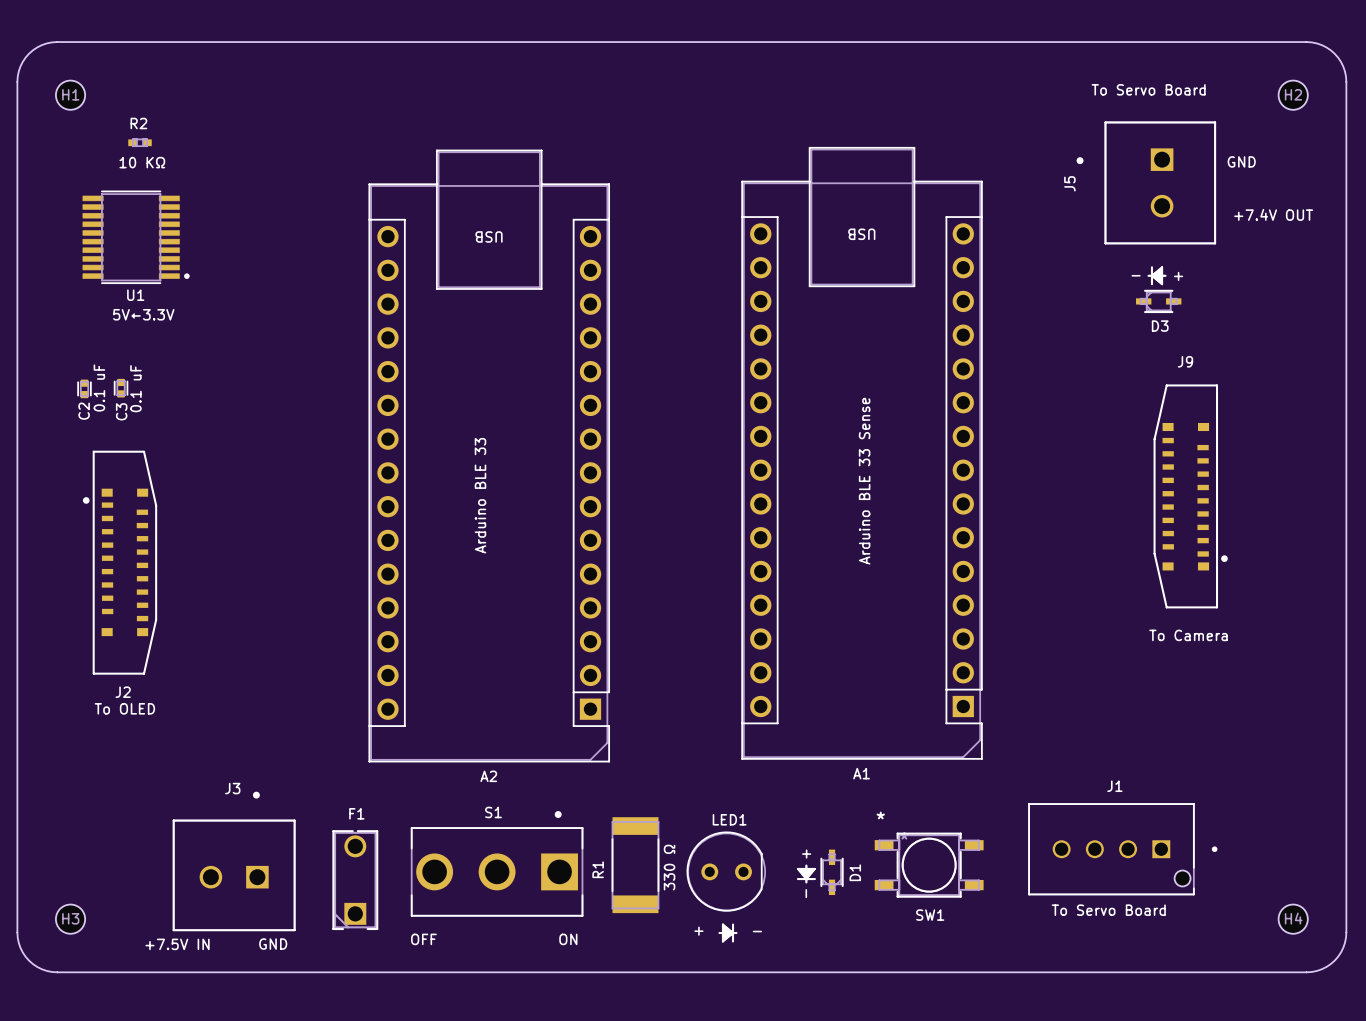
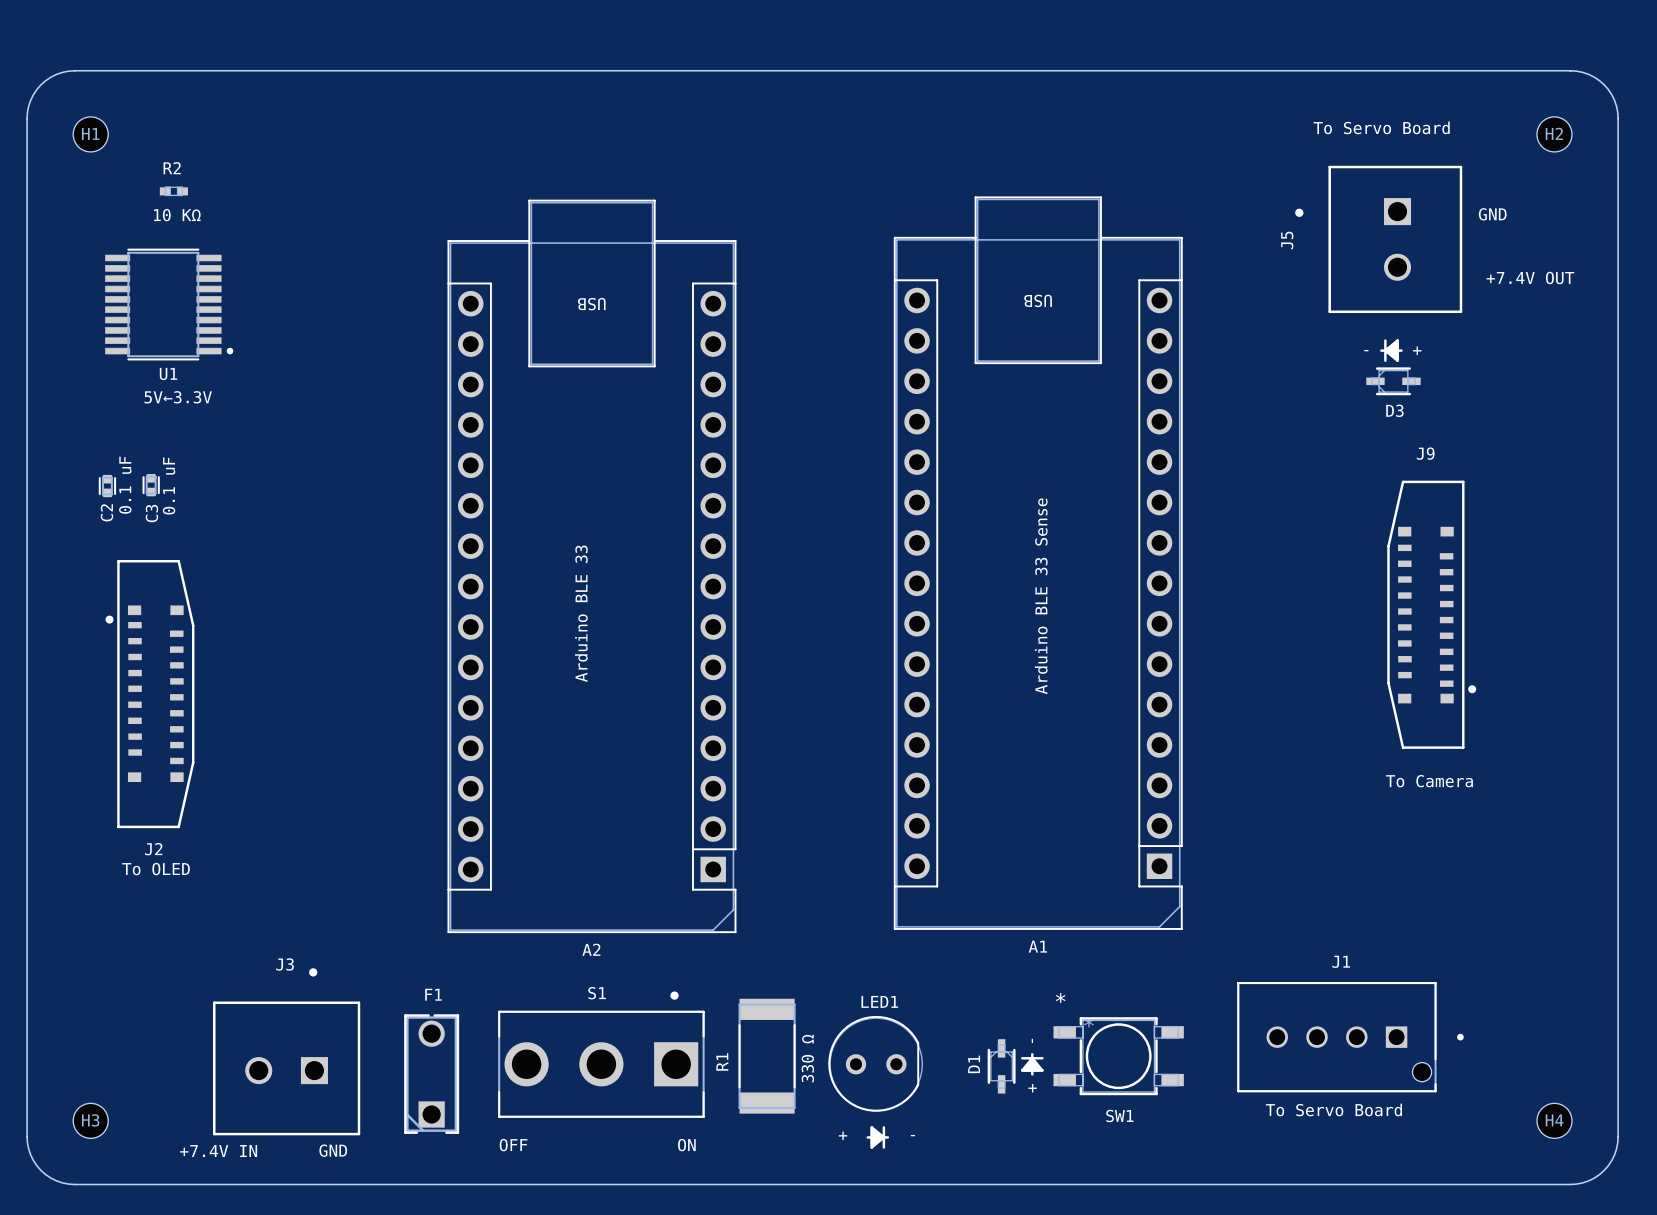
D1 rotation: 0° (820, 872) -> 180° (1015, 1066)
text: +7.5V IN (177, 944) -> +7.4V IN (218, 1151)

